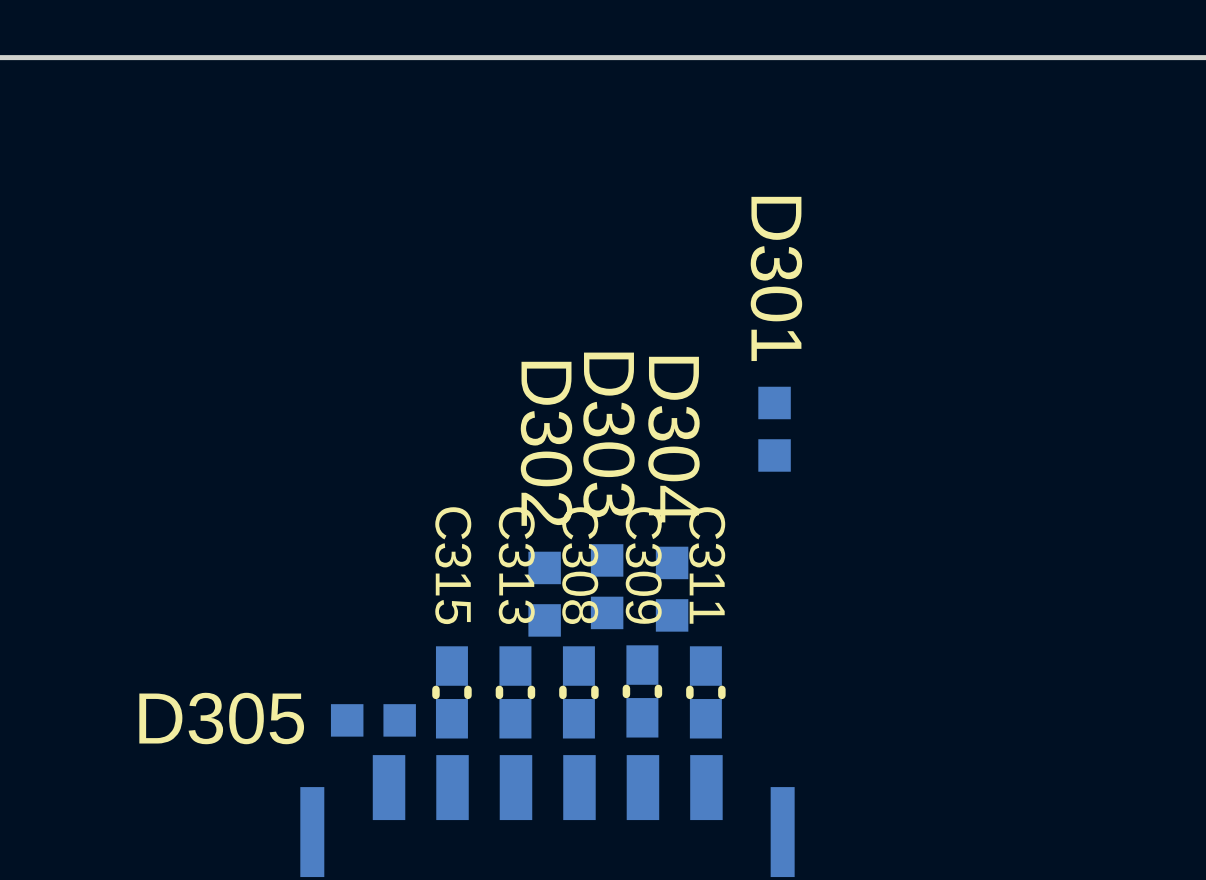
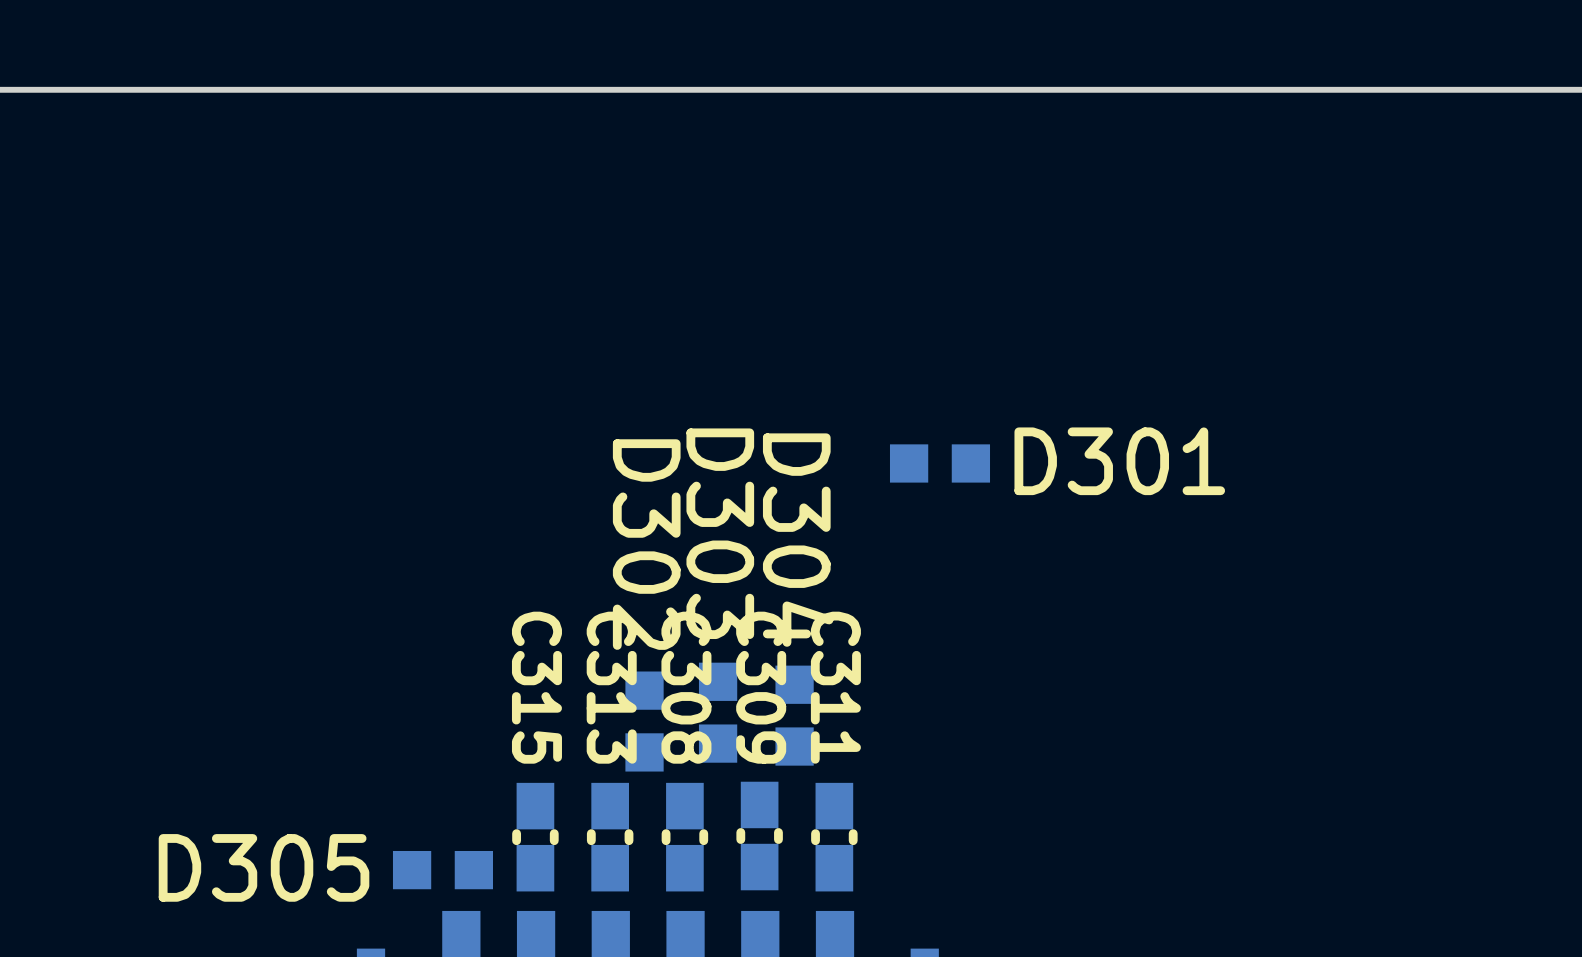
D301 rotation: 0° (774, 429) -> 90° clockwise (939, 463)
D301 position: (774, 429) -> (939, 463)

